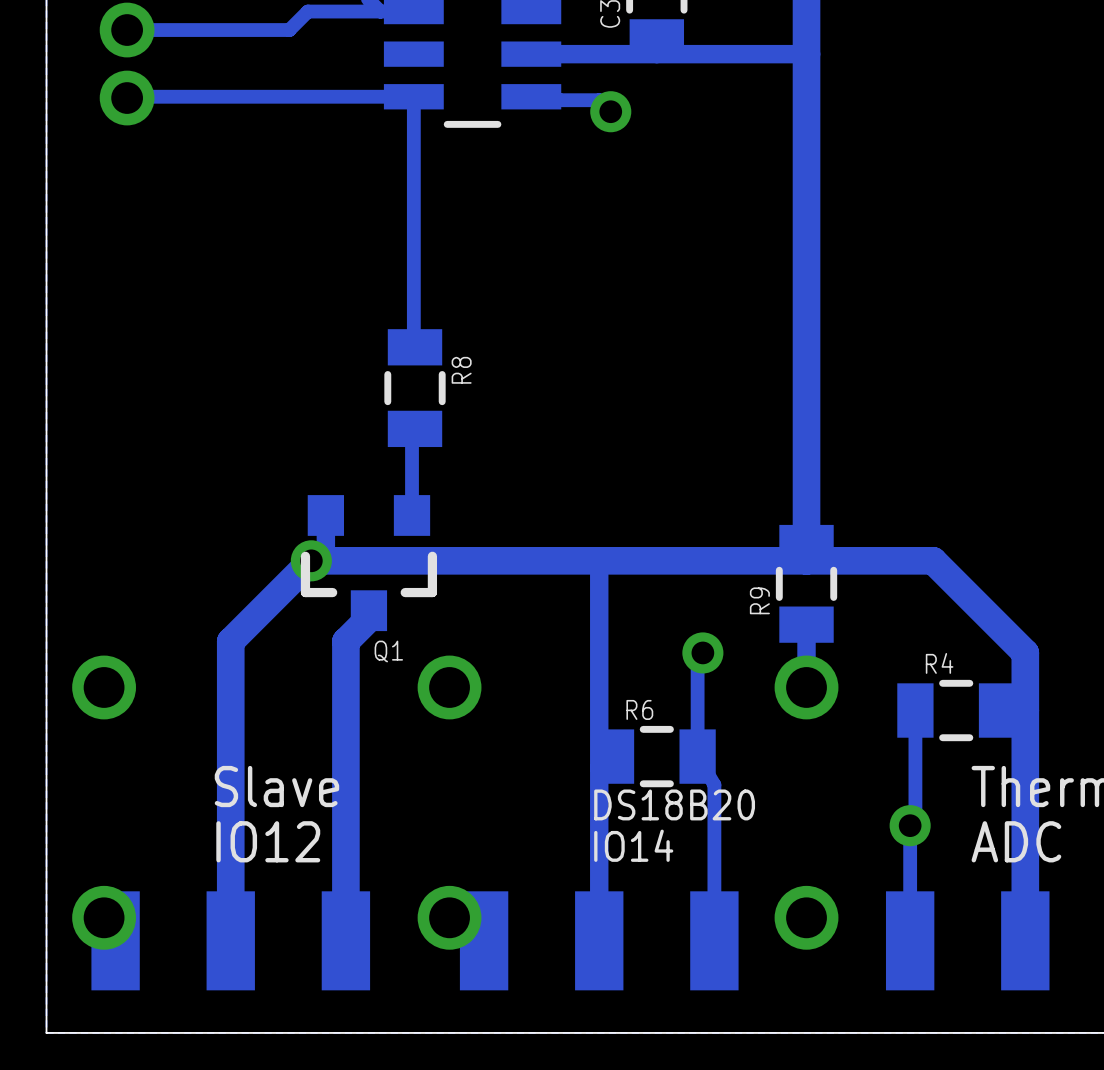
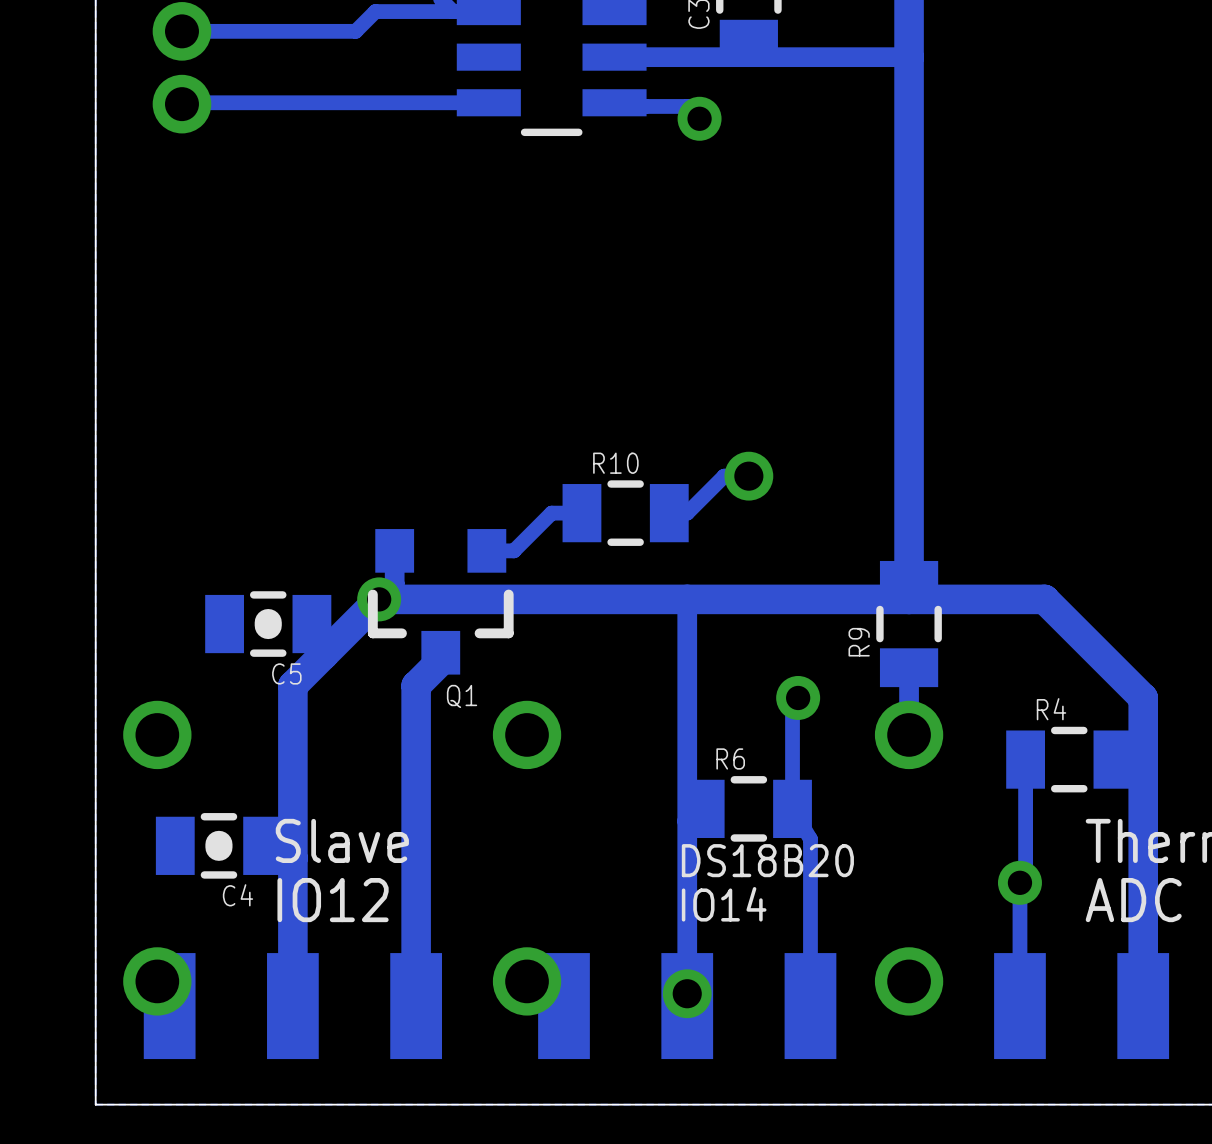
track: (413, 96) (415, 347) -> none
R8: (415, 388) -> none
track: (415, 428) (412, 428) (412, 515) -> (581, 513) (551, 513) (513, 550) (486, 550)
track: none -> (748, 476) (724, 476) (687, 513) (669, 513)
via: none -> (748, 476)
R10: none -> (625, 513)
C5: none -> (268, 624)
C4: none -> (218, 845)
via: none -> (687, 993)

